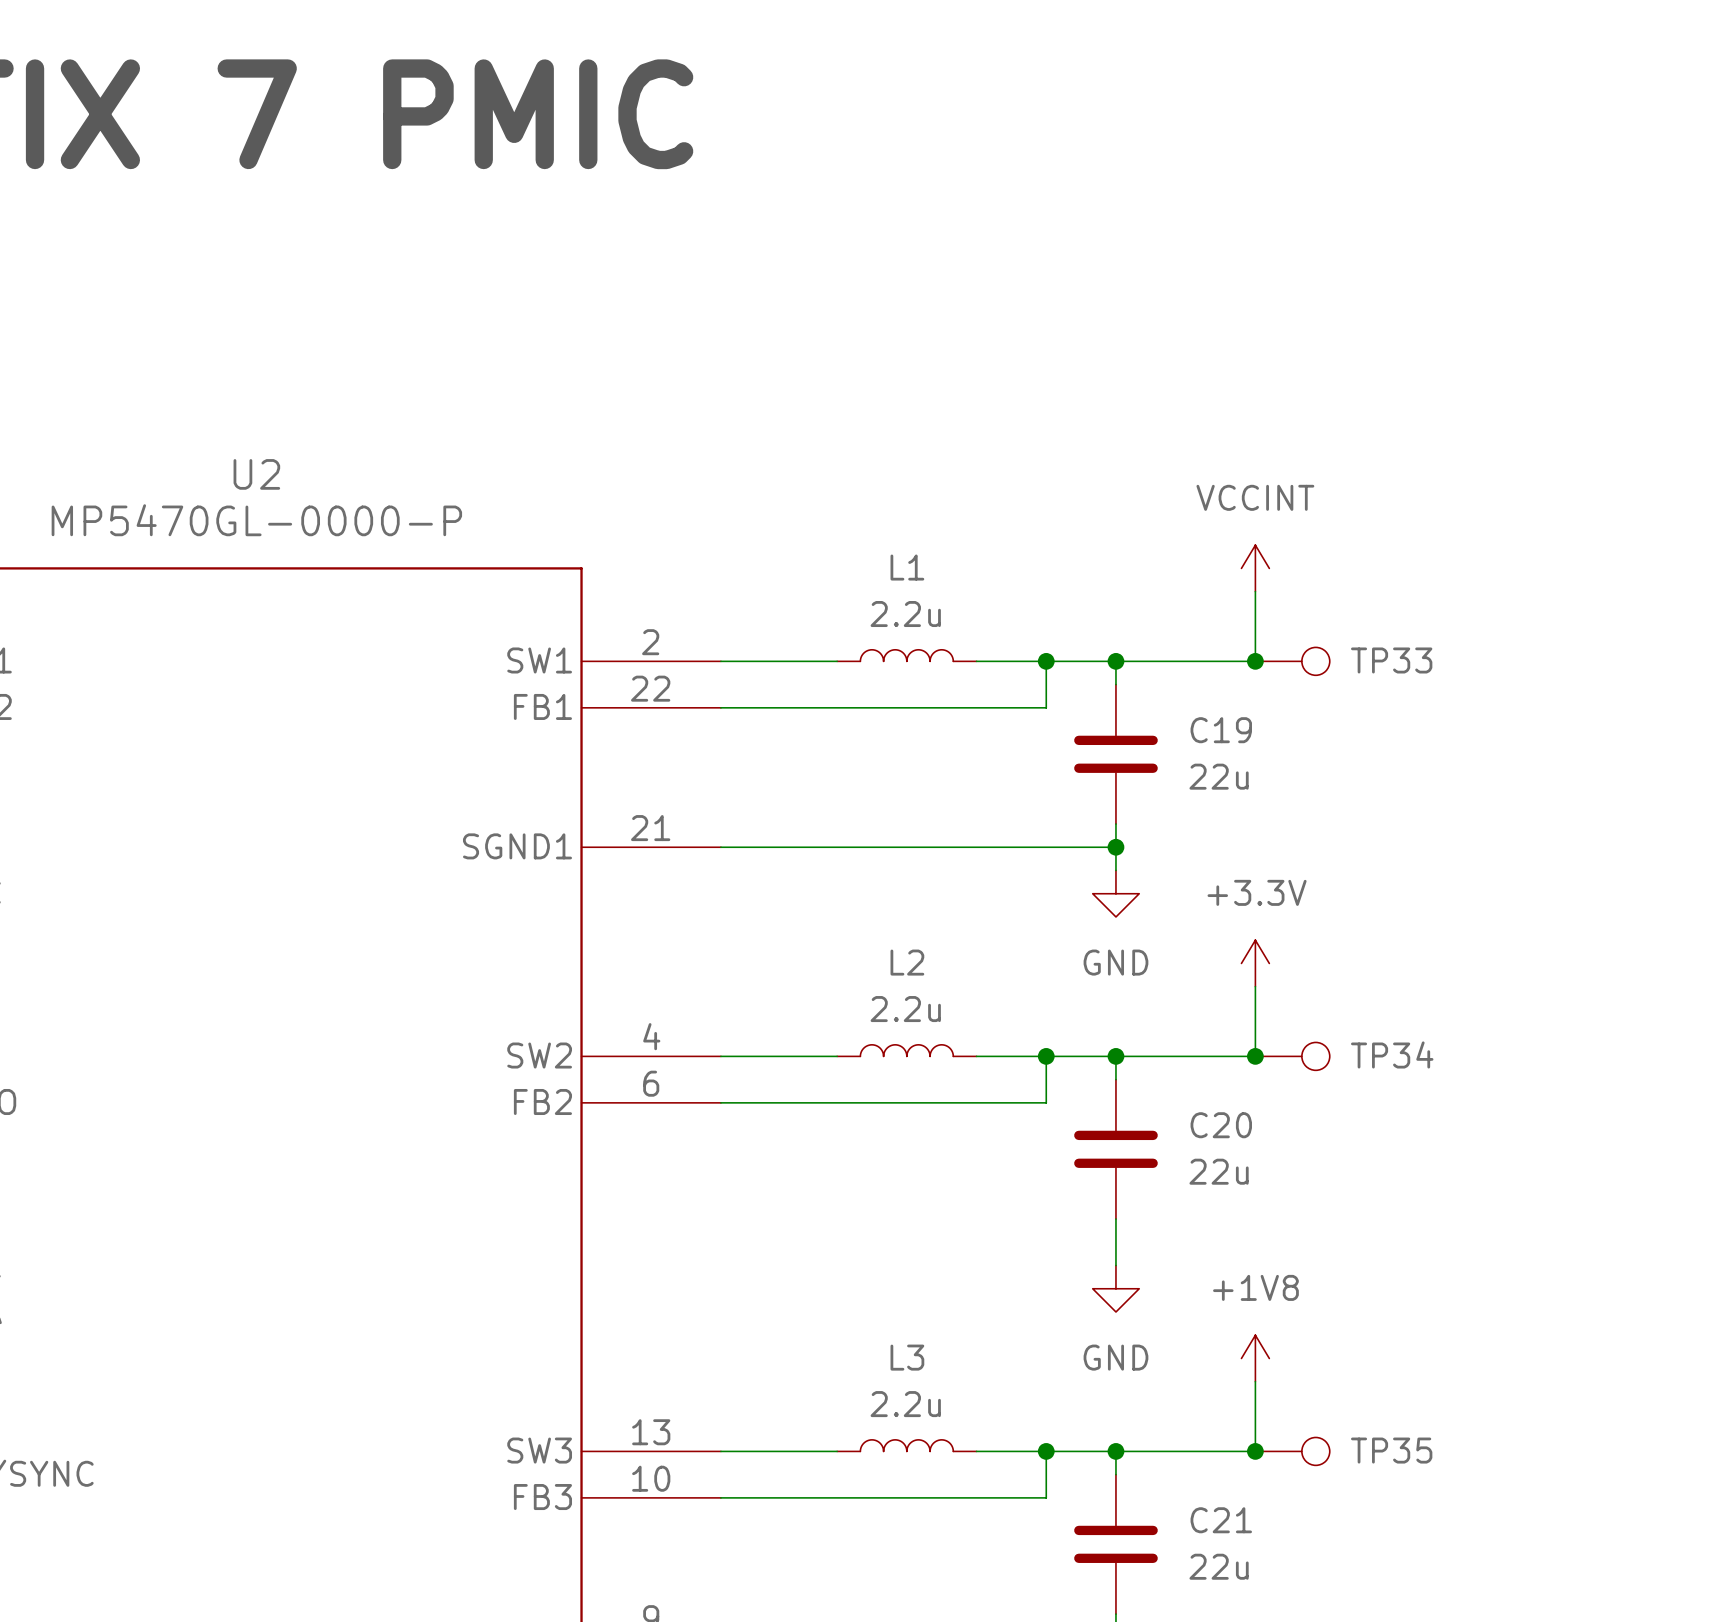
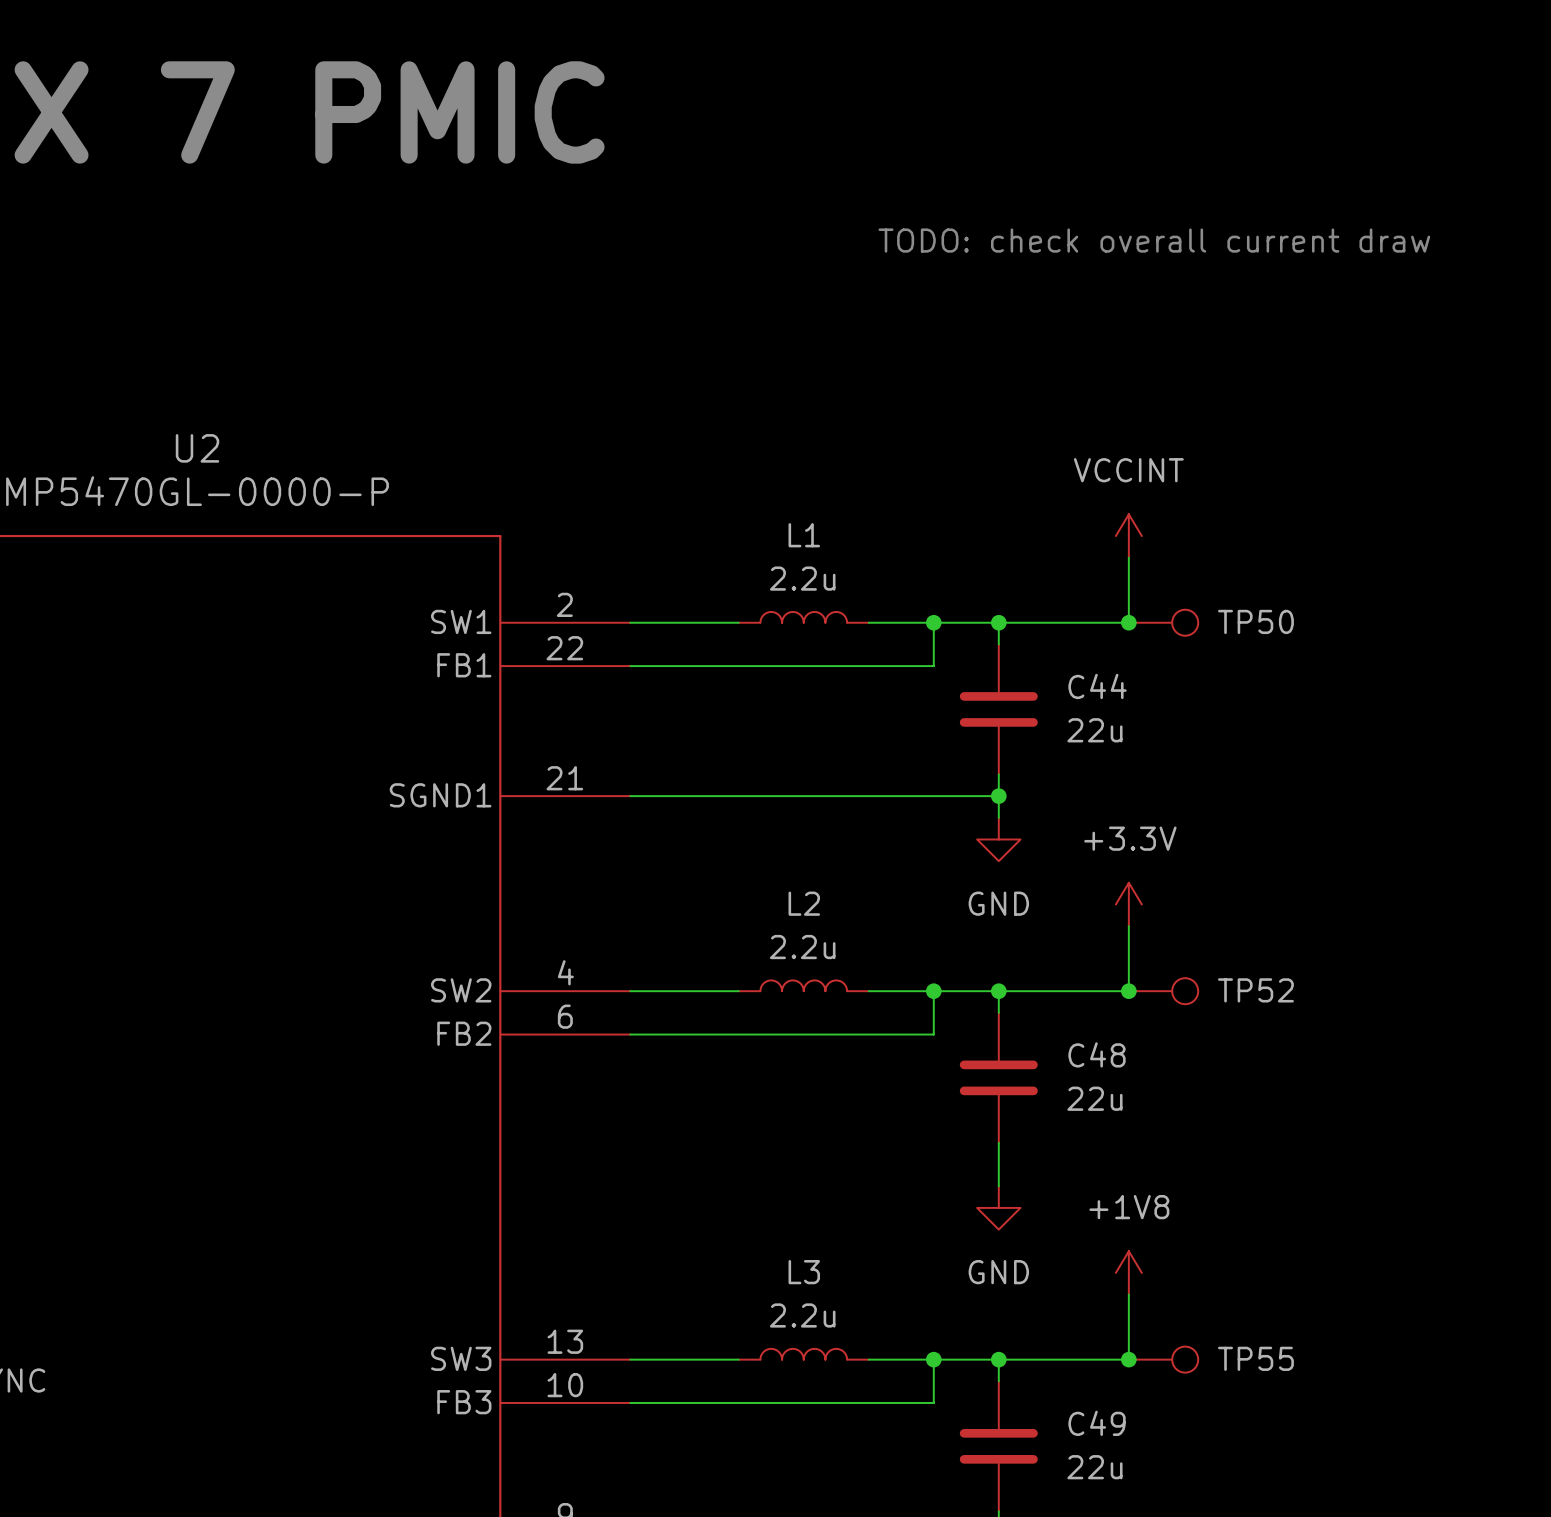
text: none -> TODO: check overall current draw (1154, 240)
TP33 name: TP33 (1391, 660) -> TP50 (1255, 621)
C19 name: C19 (1221, 730) -> C44 (1097, 686)
TP34 name: TP34 (1392, 1054) -> TP52 (1255, 990)
C20 name: C20 (1221, 1125) -> C48 (1097, 1054)
TP35 name: TP35 (1391, 1450) -> TP55 (1255, 1358)
C21 name: C21 (1221, 1520) -> C49 (1097, 1423)

